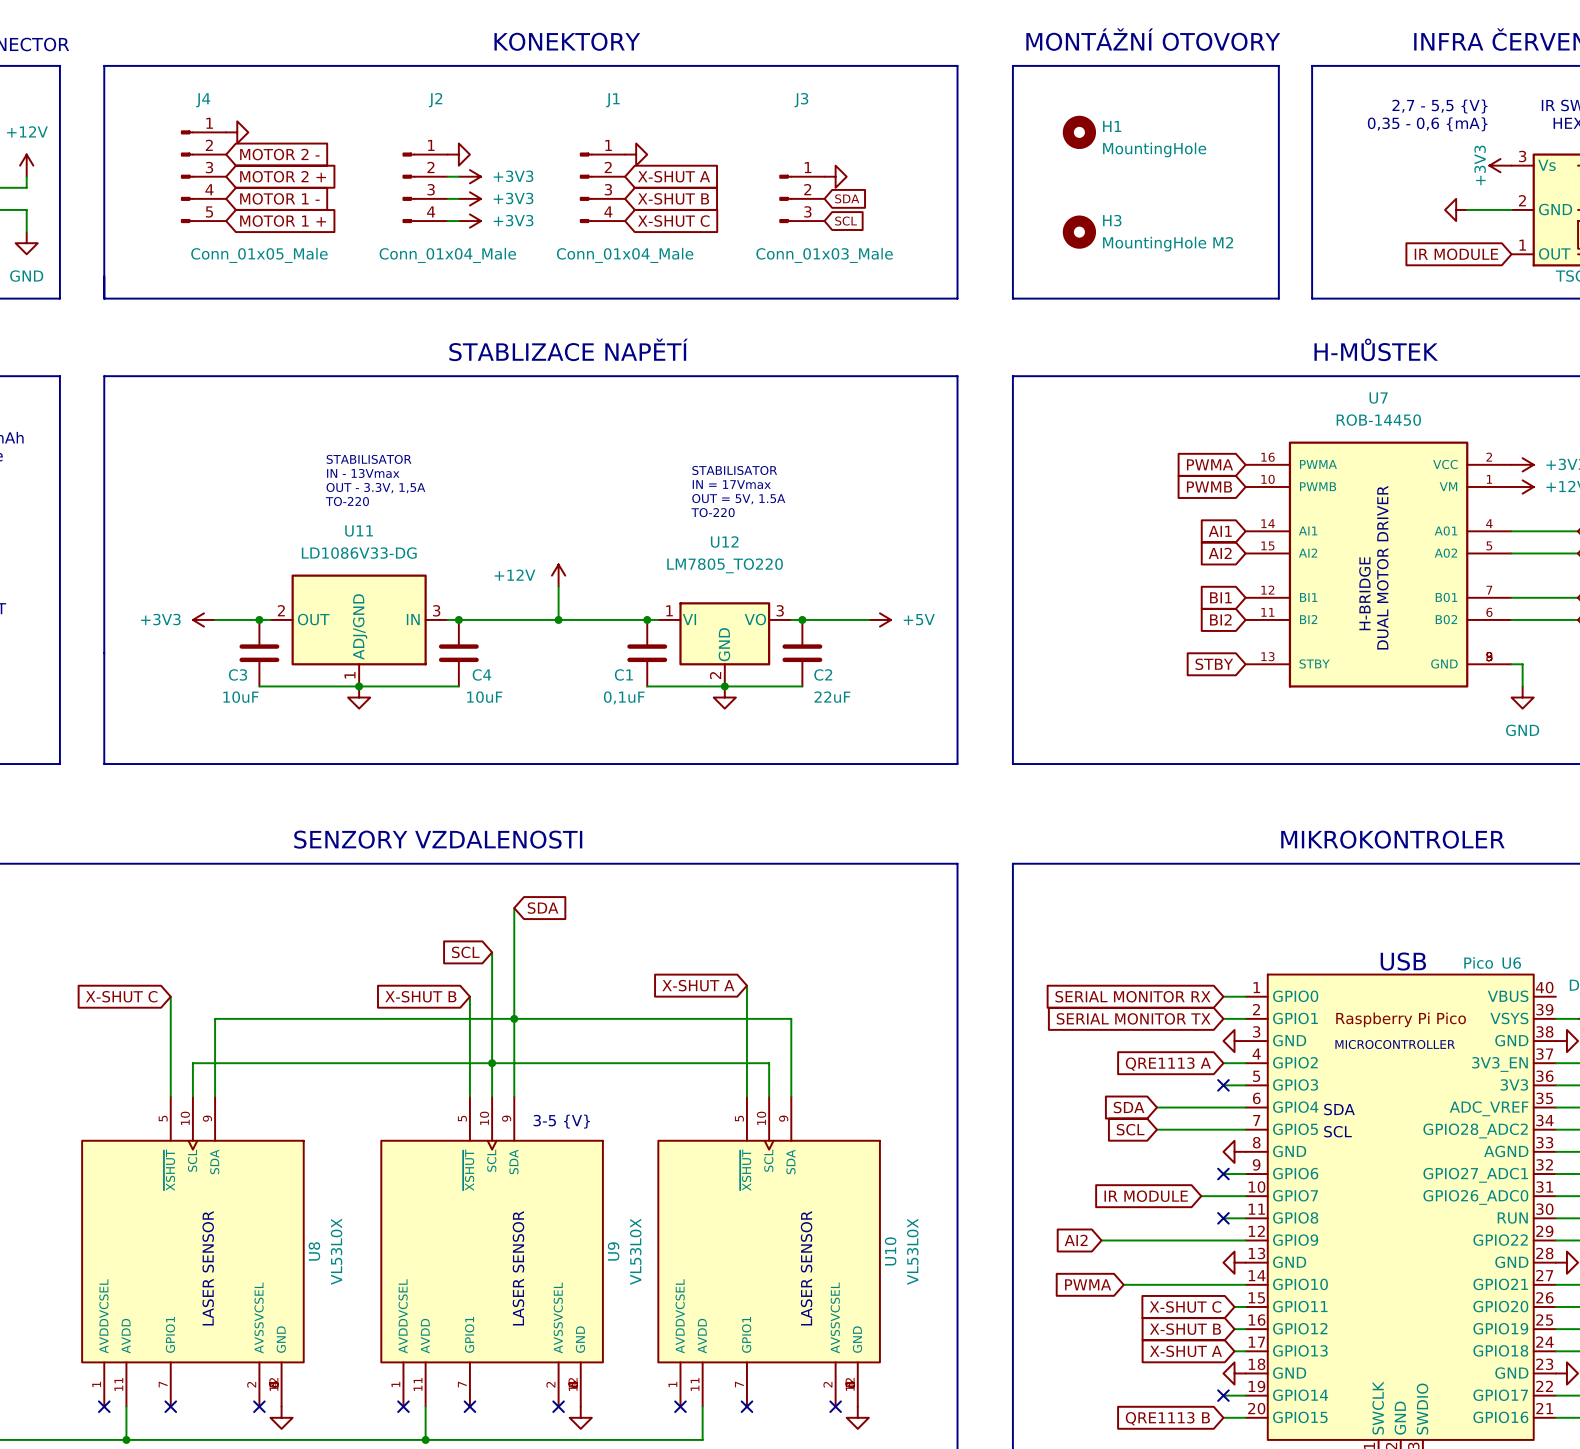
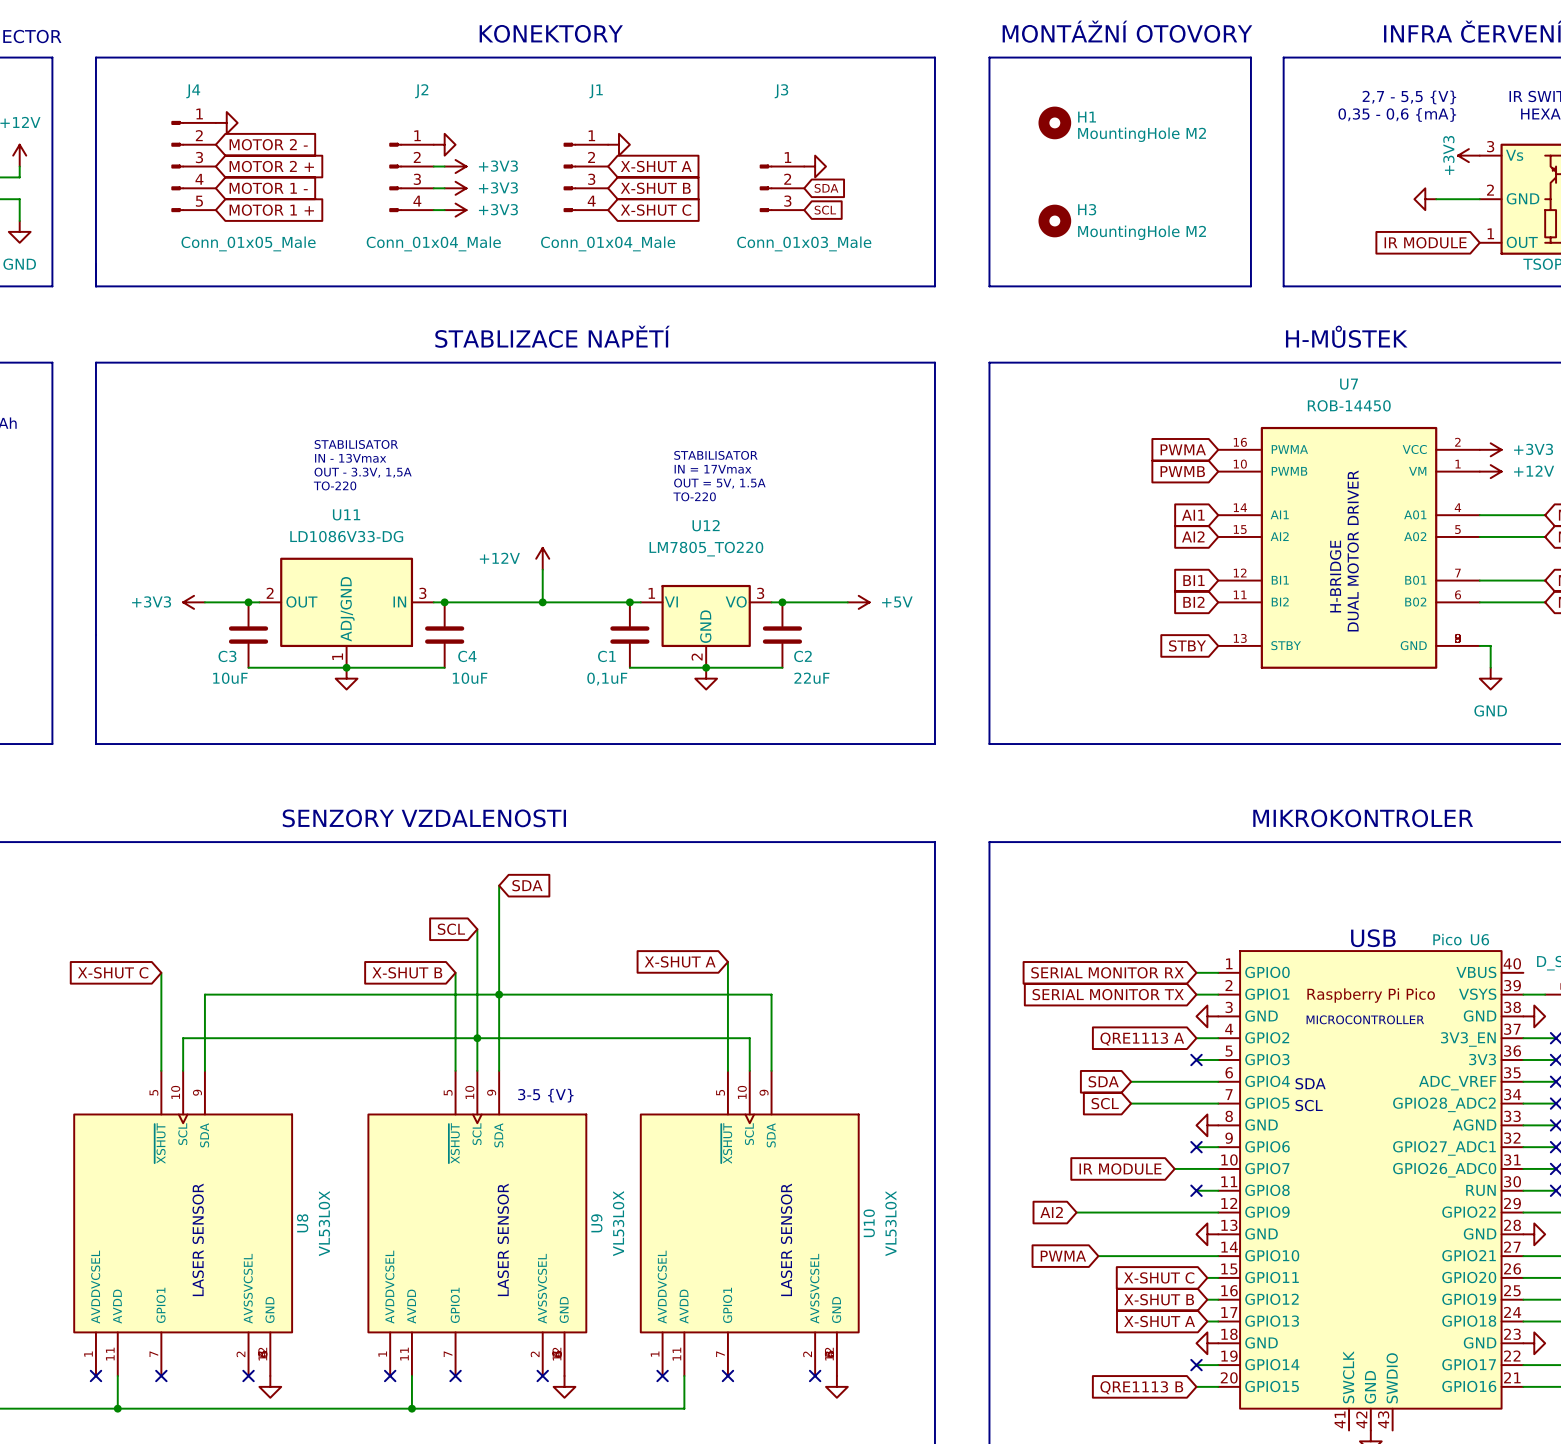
H1 value: MountingHole (1154, 149) -> MountingHole M2 (1142, 134)

